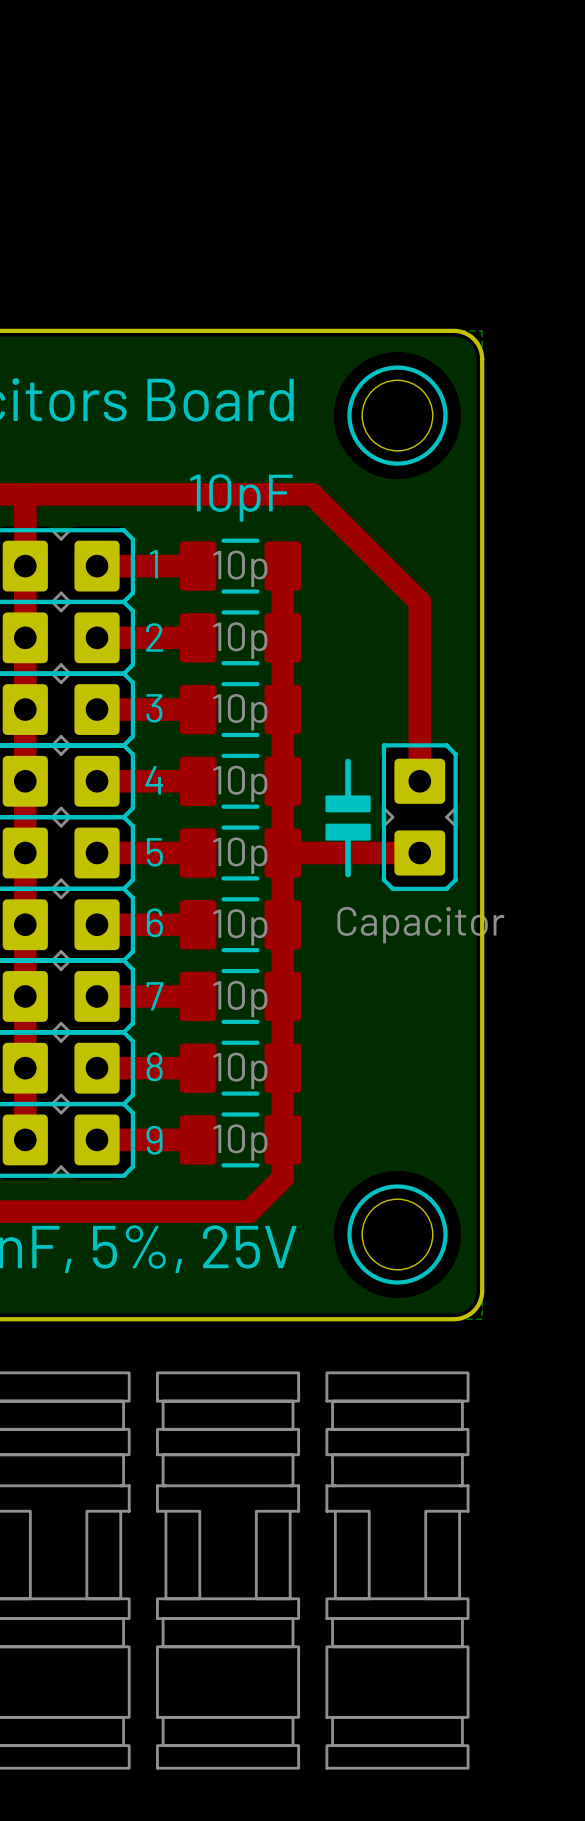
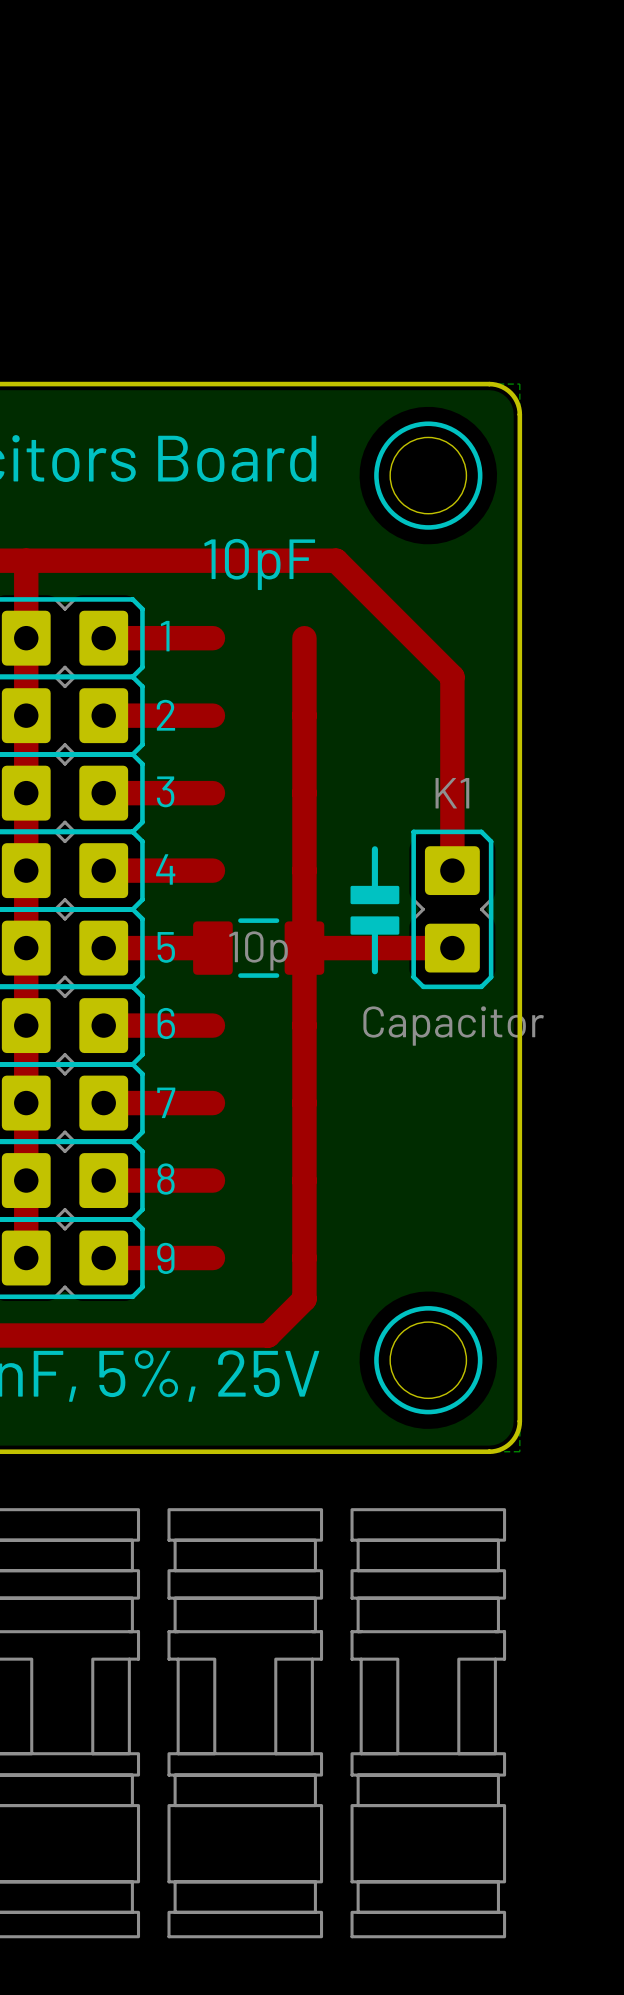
part: 10p (240, 566) -> none
part: 10p (240, 637) -> none
part: 10p (240, 709) -> none
K1 name: none -> K1 (452, 793)
part: 10p (240, 781) -> none
part: 10p (240, 924) -> none
part: 10p (240, 996) -> none
part: 10p (240, 1068) -> none
part: 10p (240, 1139) -> none

